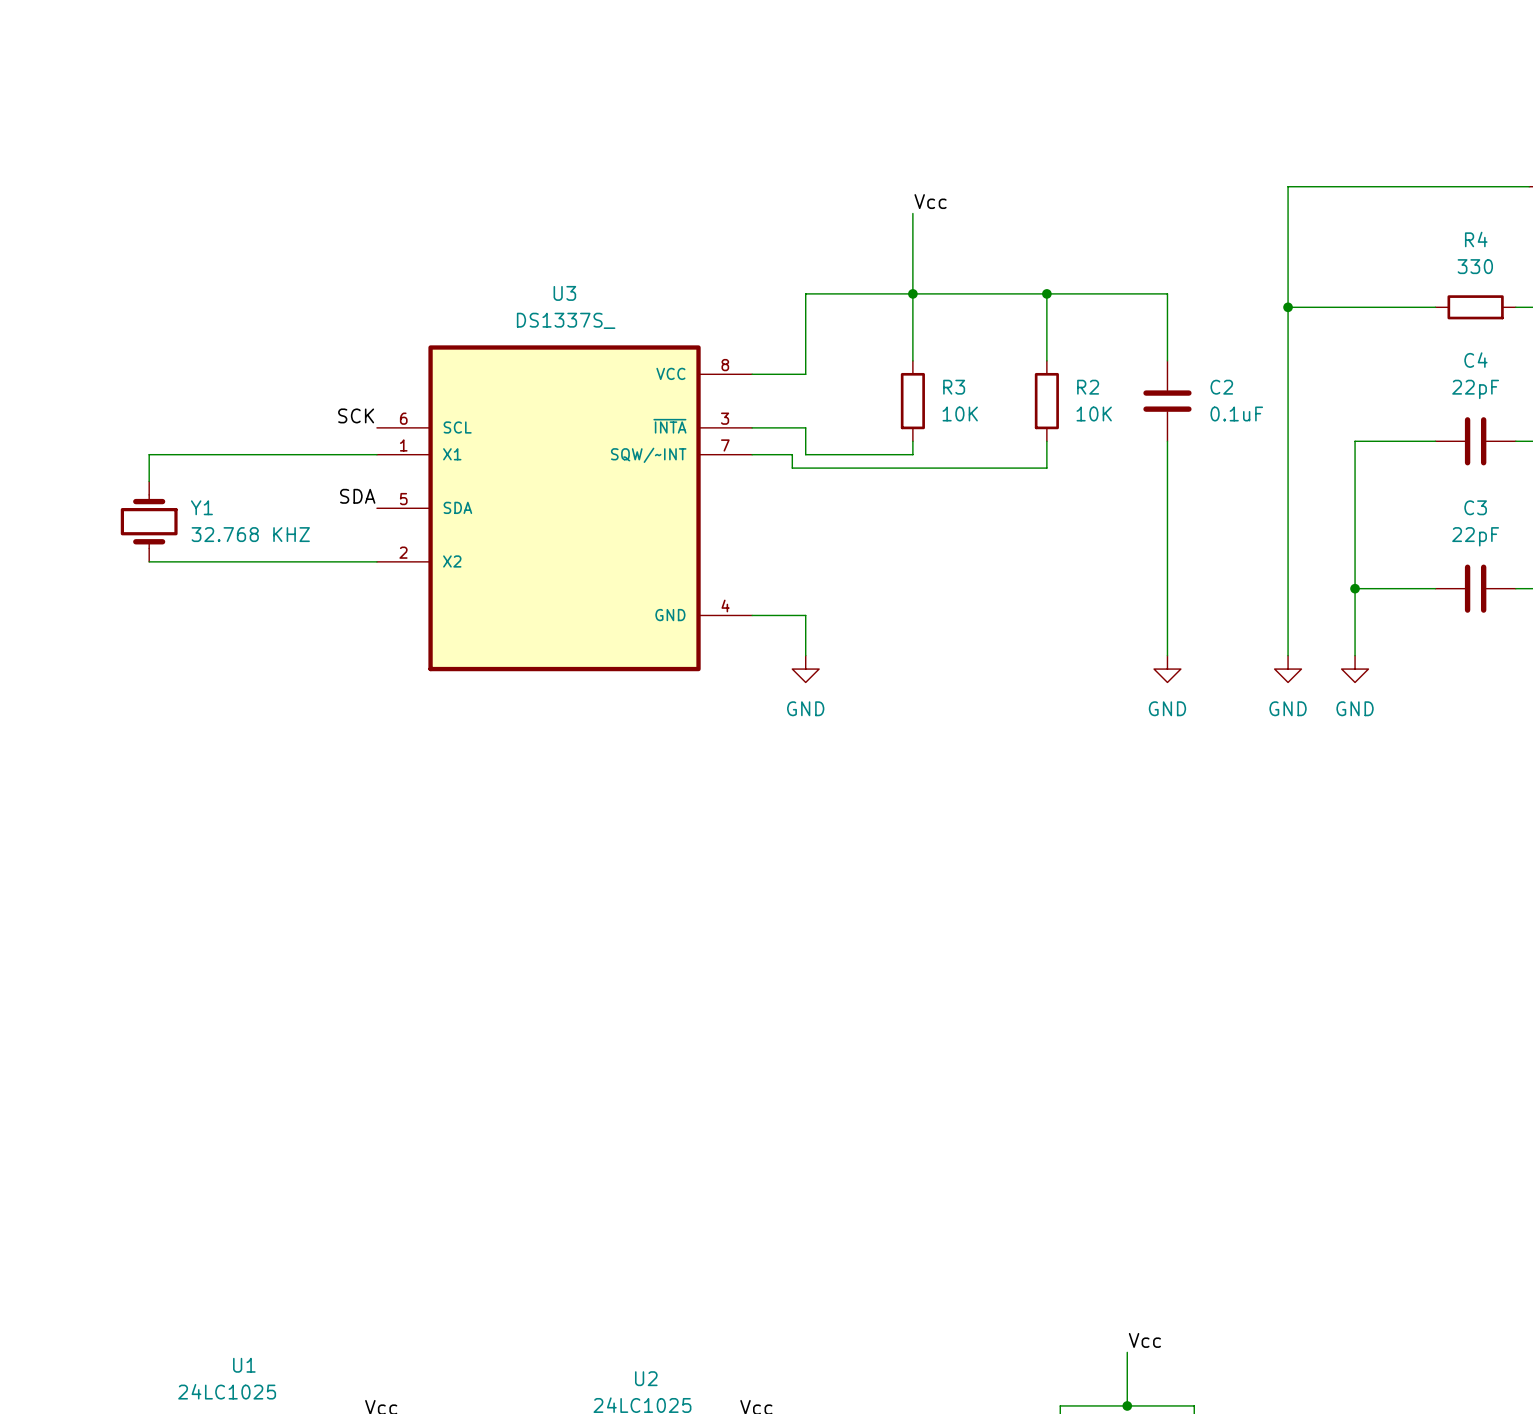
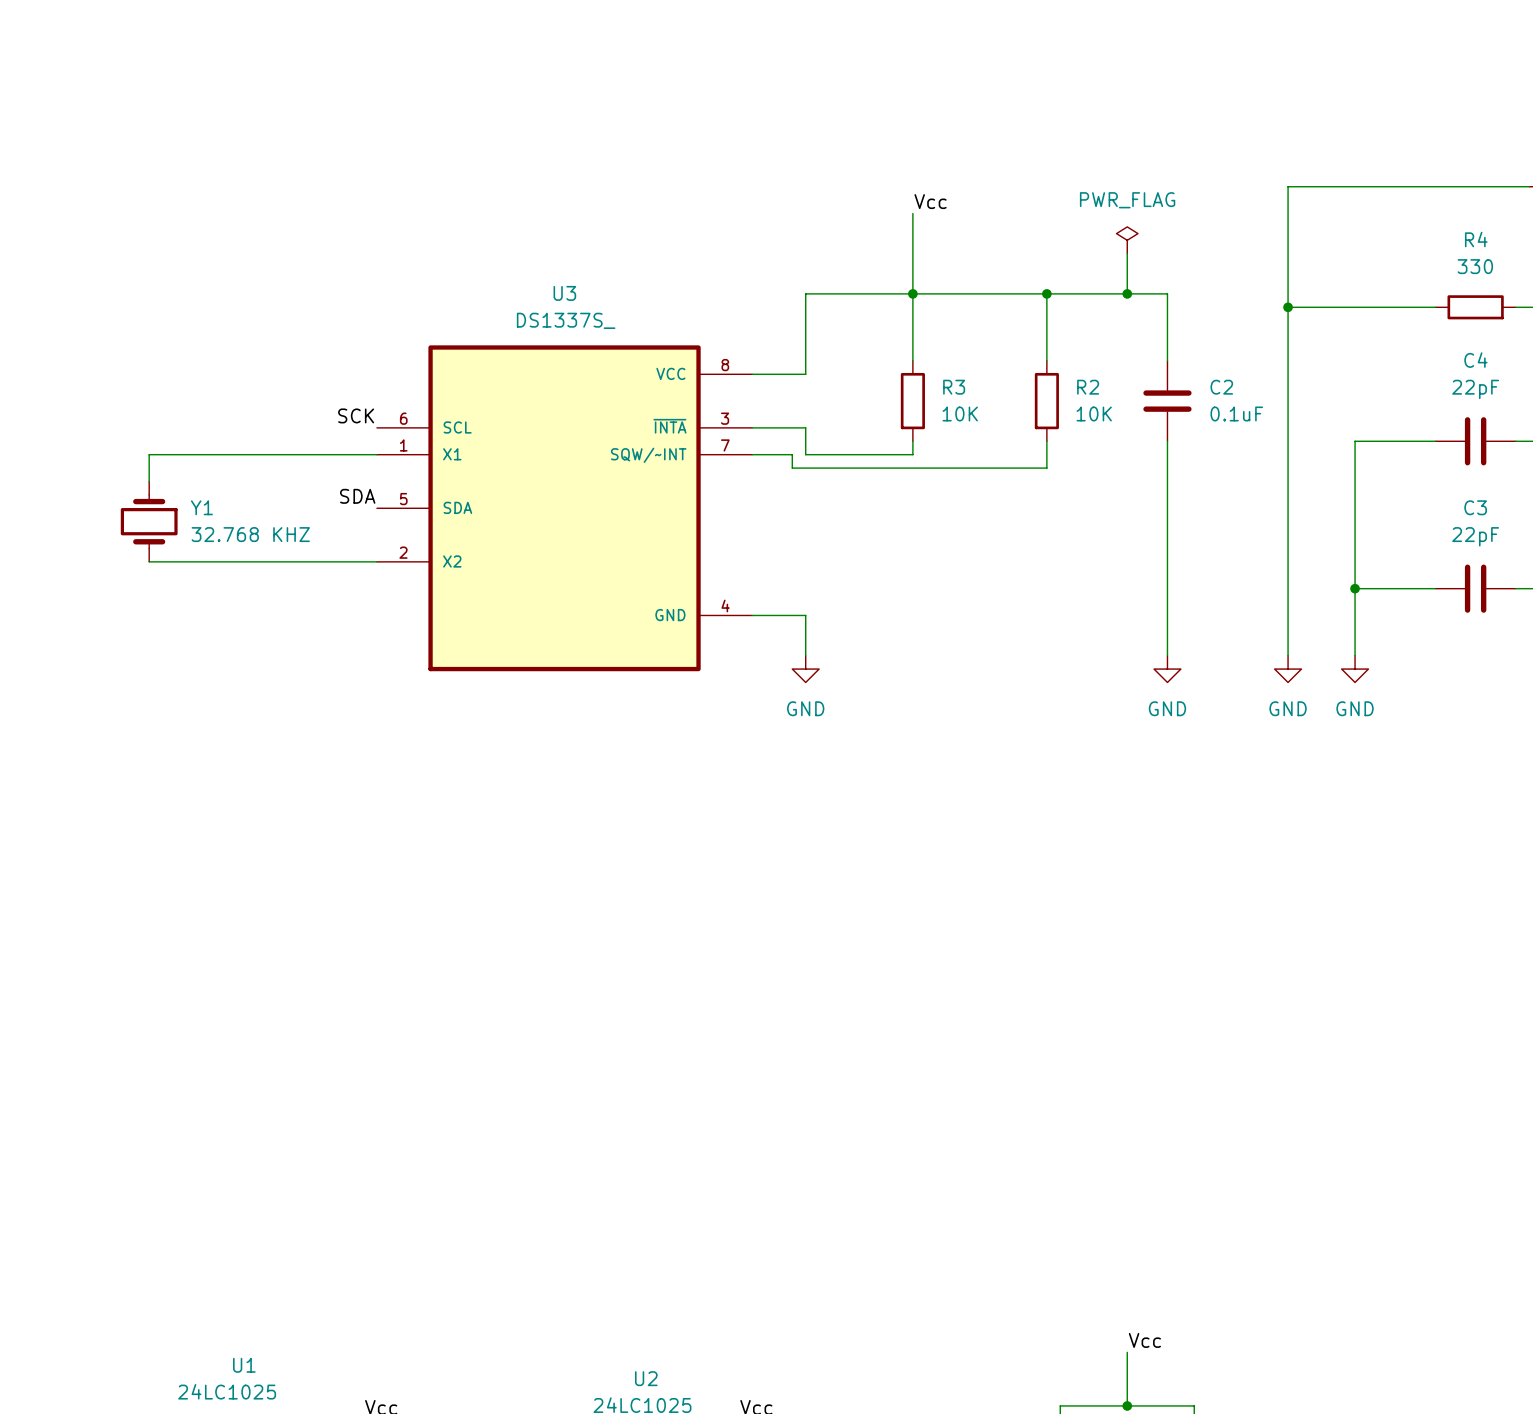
power symbol: none -> PWR_FLAG (1127, 240)
wire: none -> (1127, 253) (1127, 293)
junction: none -> (1127, 293)

